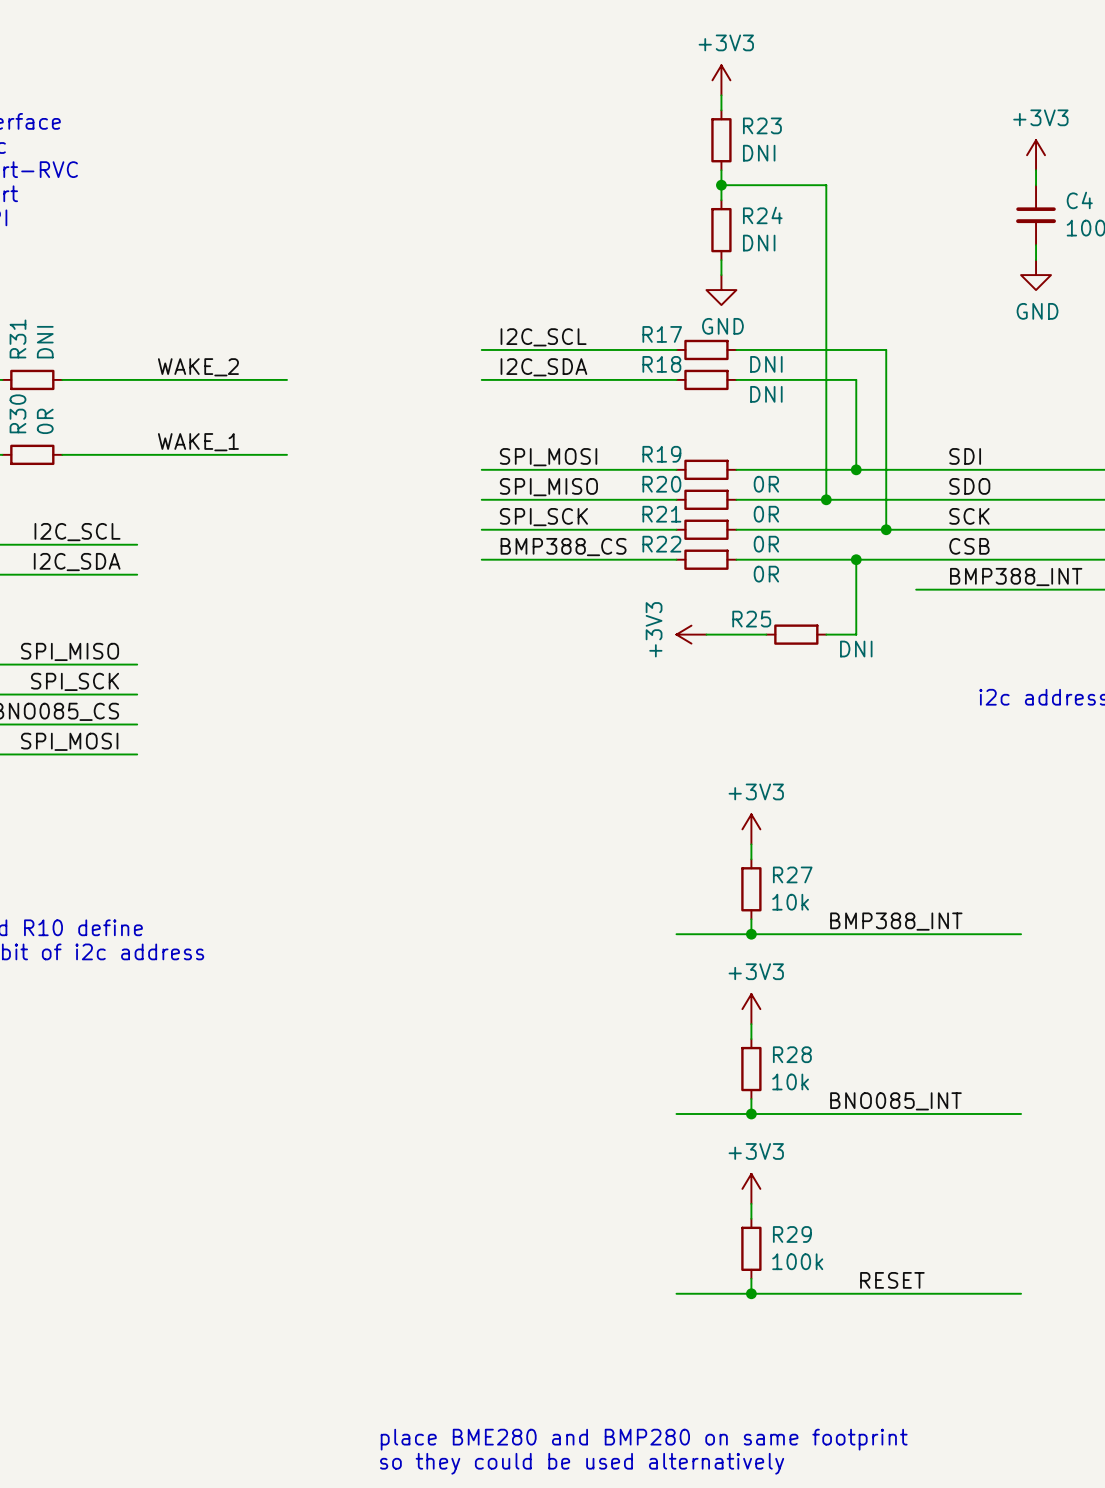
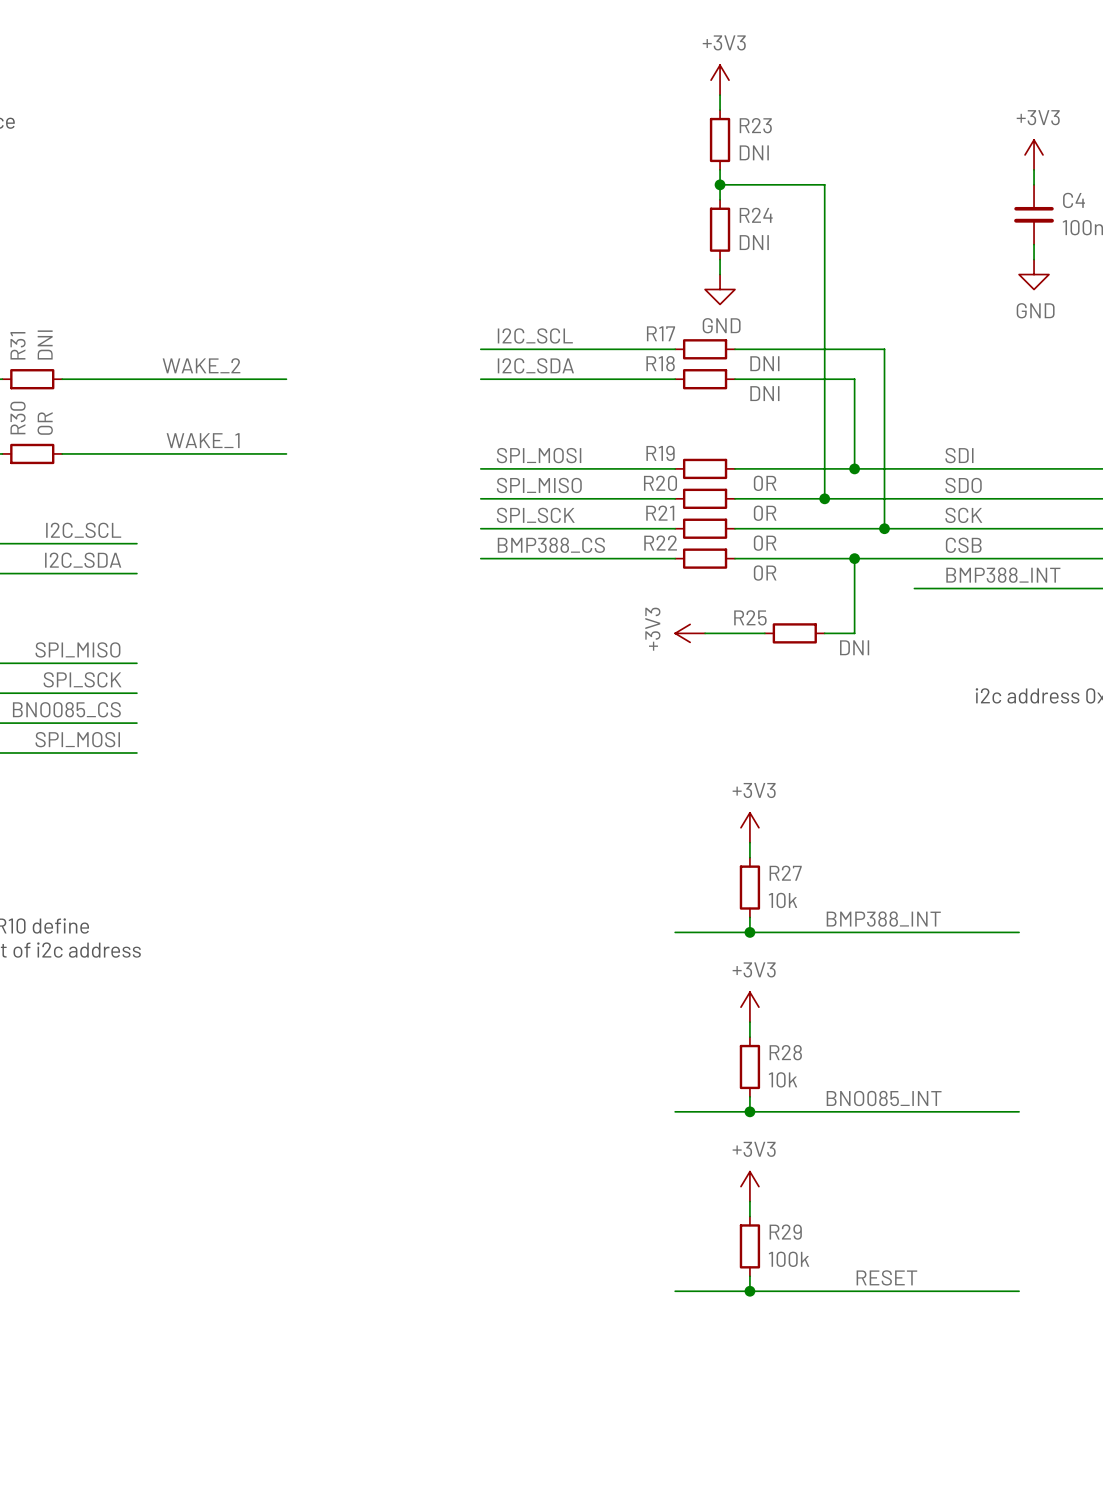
text: place BME280 and BMP280 on same footprint (644, 1439) -> none
text: so they could be used alternatively (582, 1463) -> none

